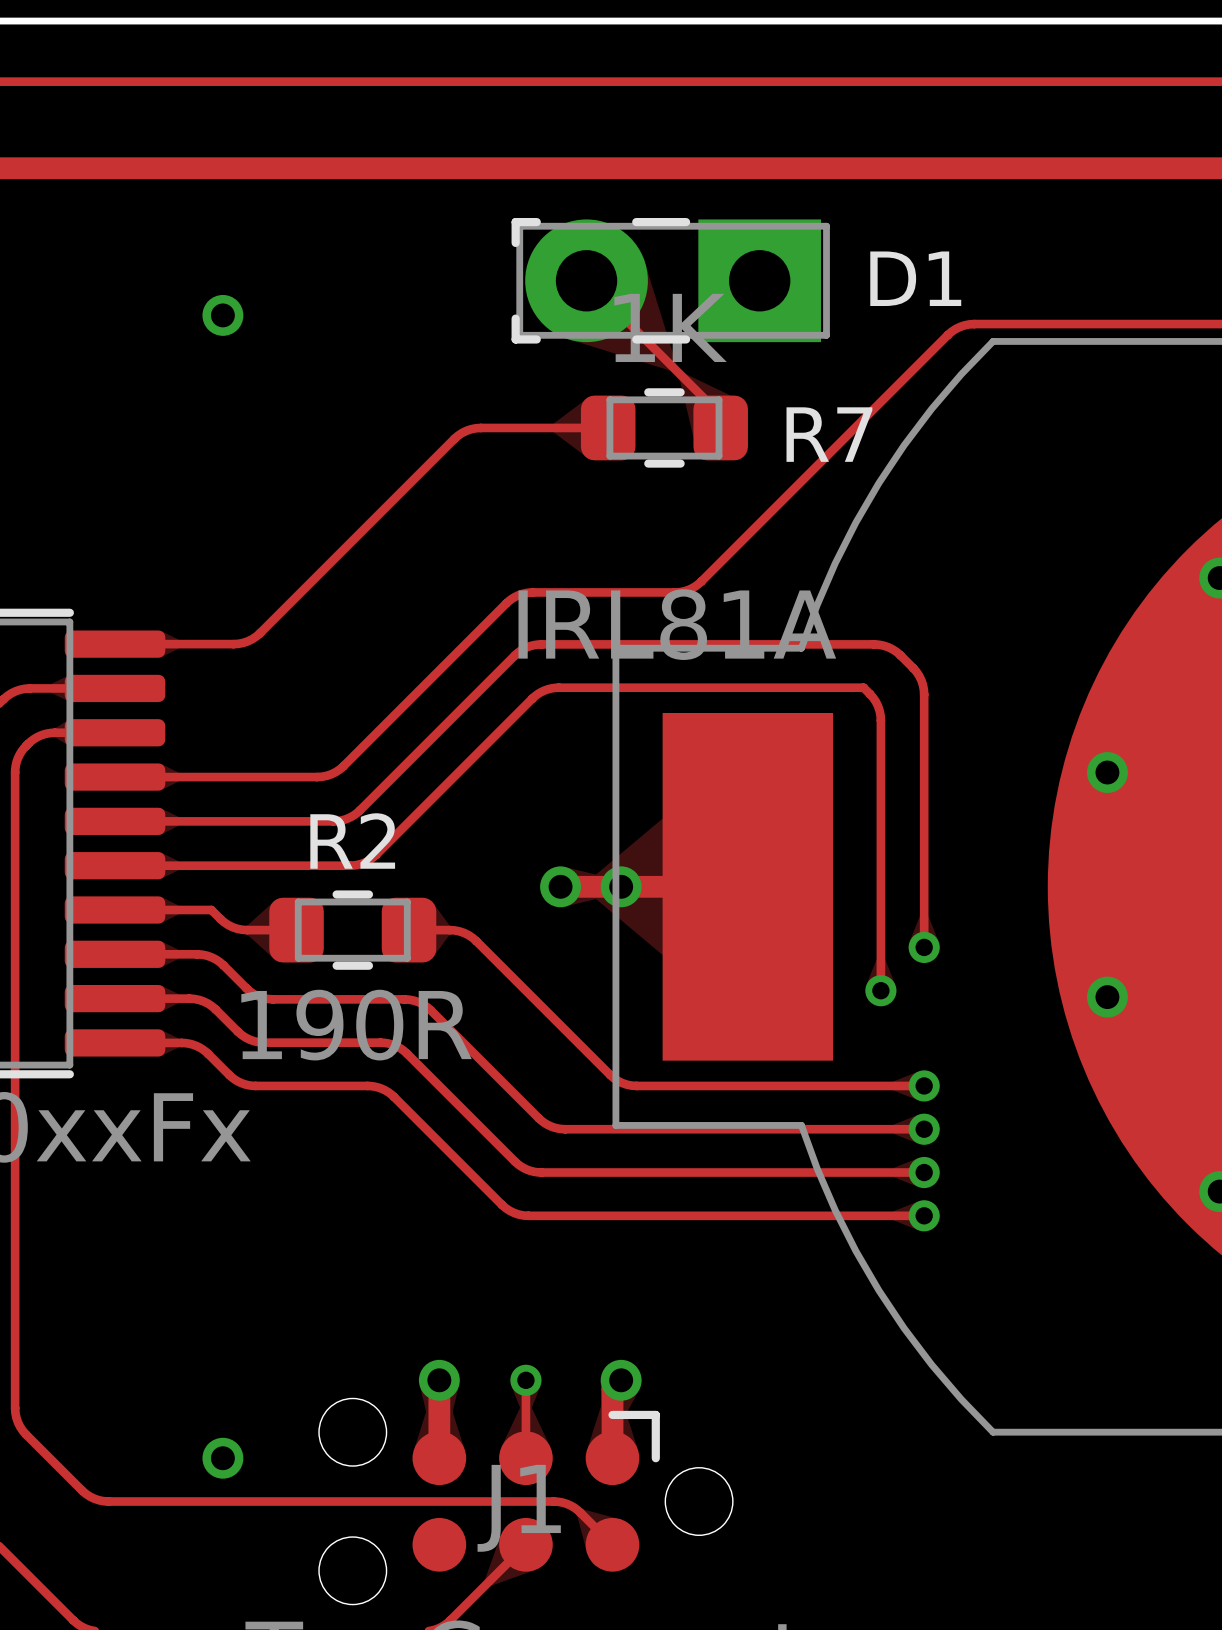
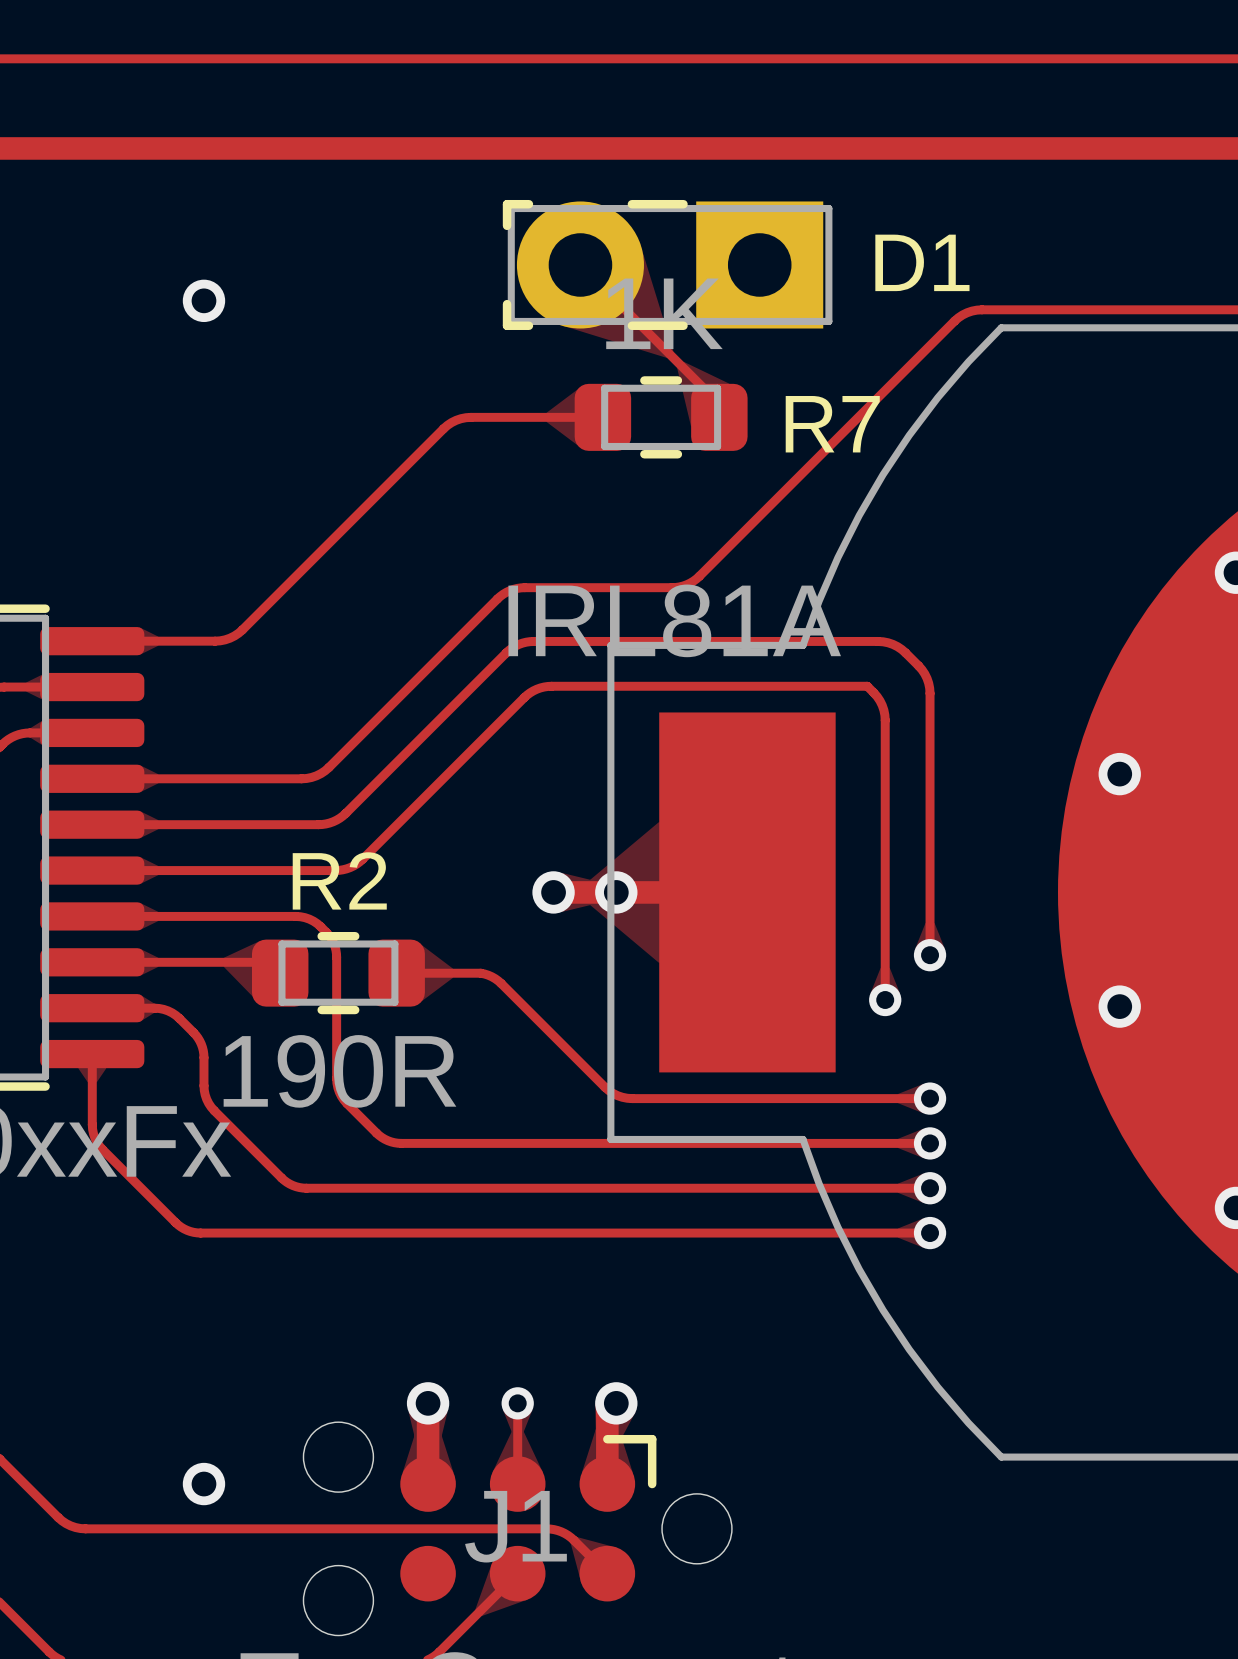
track: (211, 910) (224, 922) (237, 928) (296, 930) -> none
R2 position: (352, 930) -> (338, 973)
track: (409, 930) (449, 930) (464, 932) (476, 941) (509, 974) -> (396, 973) (480, 973) (491, 976) (501, 983)
track: (196, 954) (215, 959) (250, 991) (263, 998) (404, 999) (418, 1002) (430, 1010) (541, 1120) (550, 1126) (565, 1129) -> (192, 916) (300, 916) (313, 921) (328, 934) (333, 943) (336, 953) (337, 1087) (346, 1103) (381, 1137) (391, 1141) (401, 1143) (558, 1143)
track: none -> (177, 962) (258, 962) (269, 965) (280, 973)
track: (175, 998) (194, 998) (208, 1003) (241, 1034) (254, 1041) (380, 1042) (398, 1047) (517, 1164) (527, 1169) (541, 1172) -> (154, 1008) (172, 1012) (195, 1035) (203, 1050) (204, 1090) (208, 1103) (289, 1184) (306, 1188) (533, 1188)
track: (115, 1042) (192, 1044) (205, 1051) (234, 1079) (248, 1085) (367, 1085) (381, 1088) (394, 1096) (505, 1208) (514, 1212) (528, 1215) -> (92, 1054) (92, 1124) (97, 1142) (175, 1222) (187, 1230) (200, 1233) (520, 1233)

